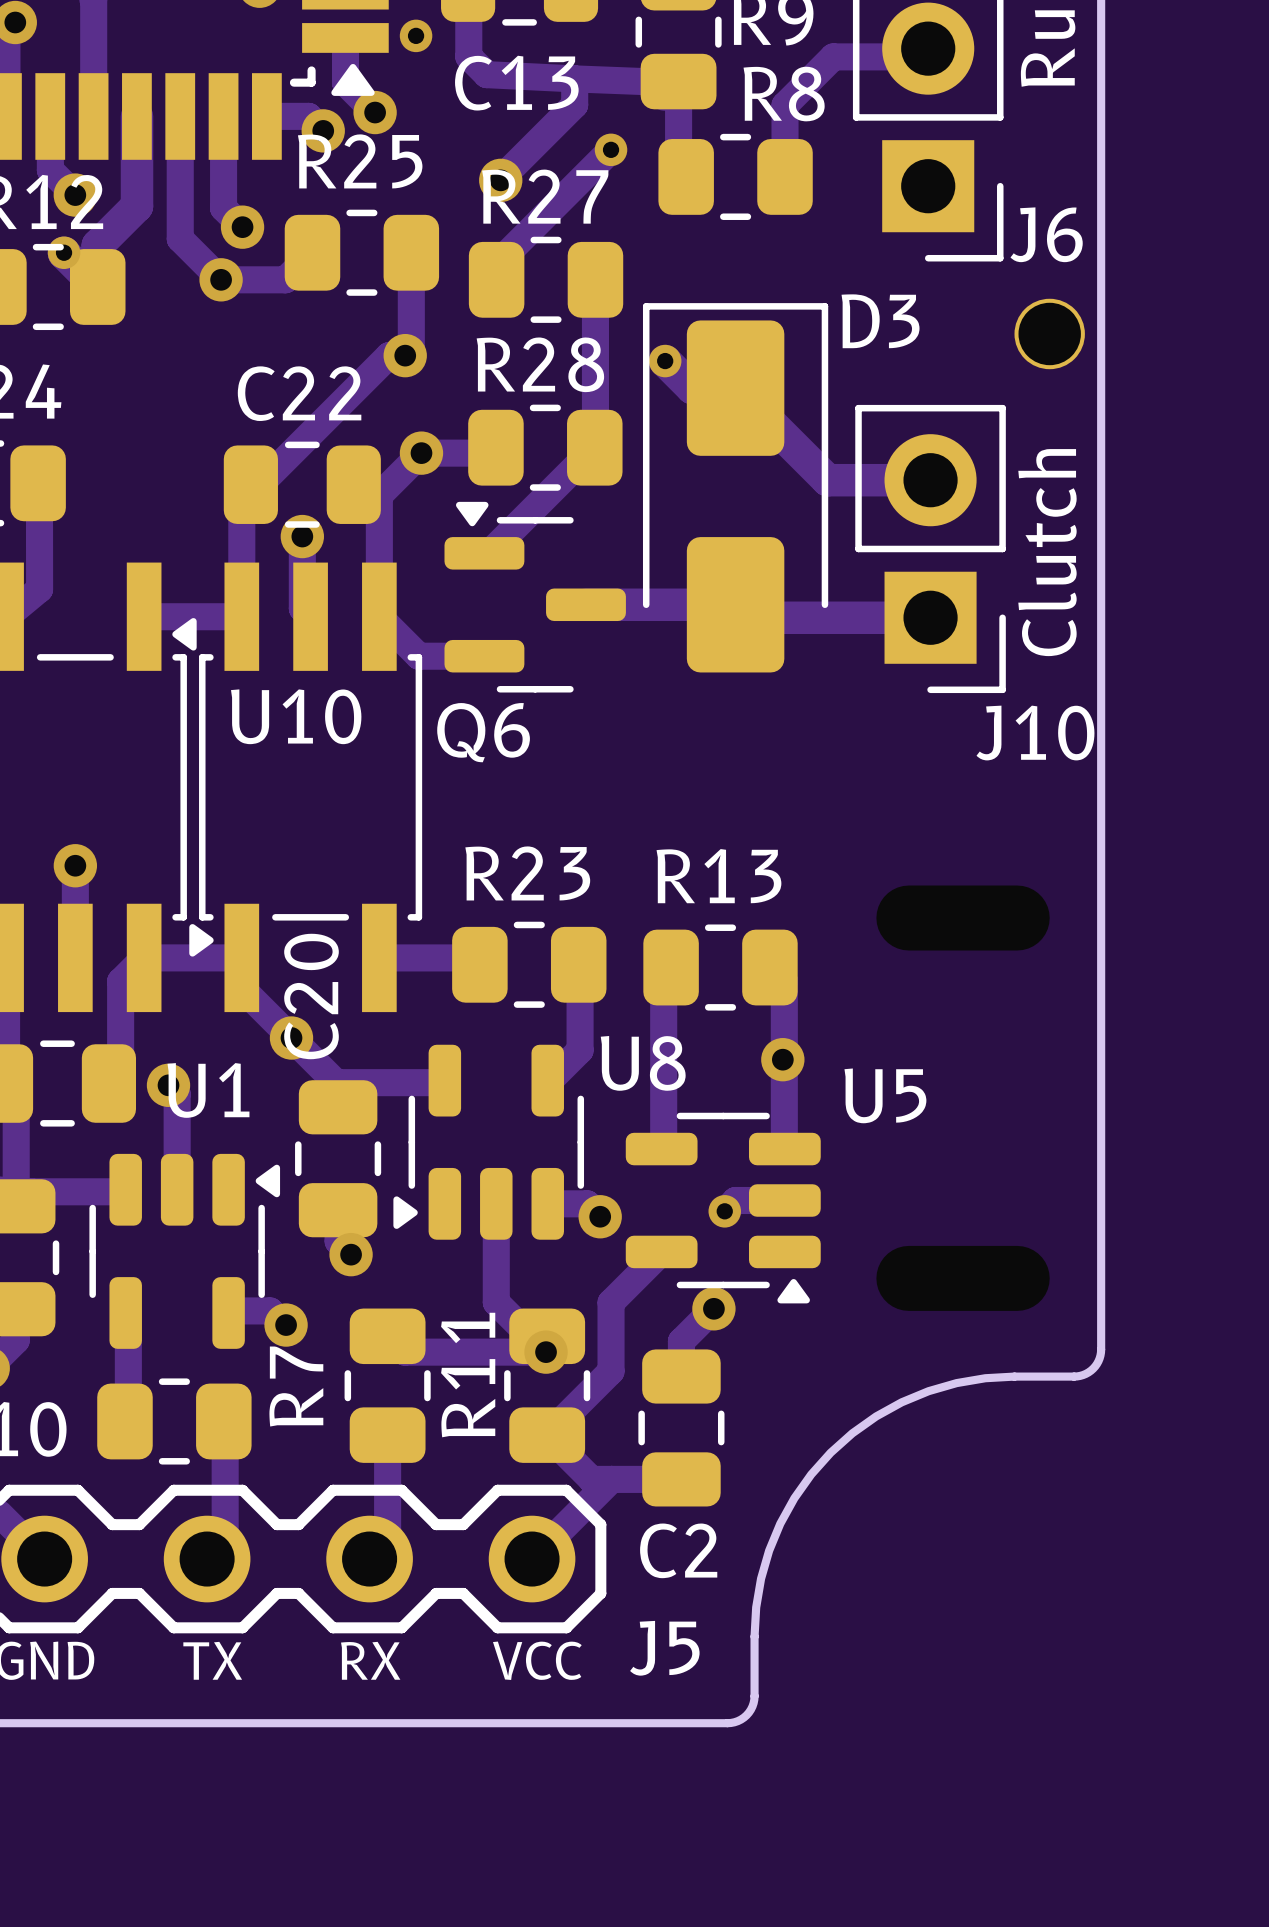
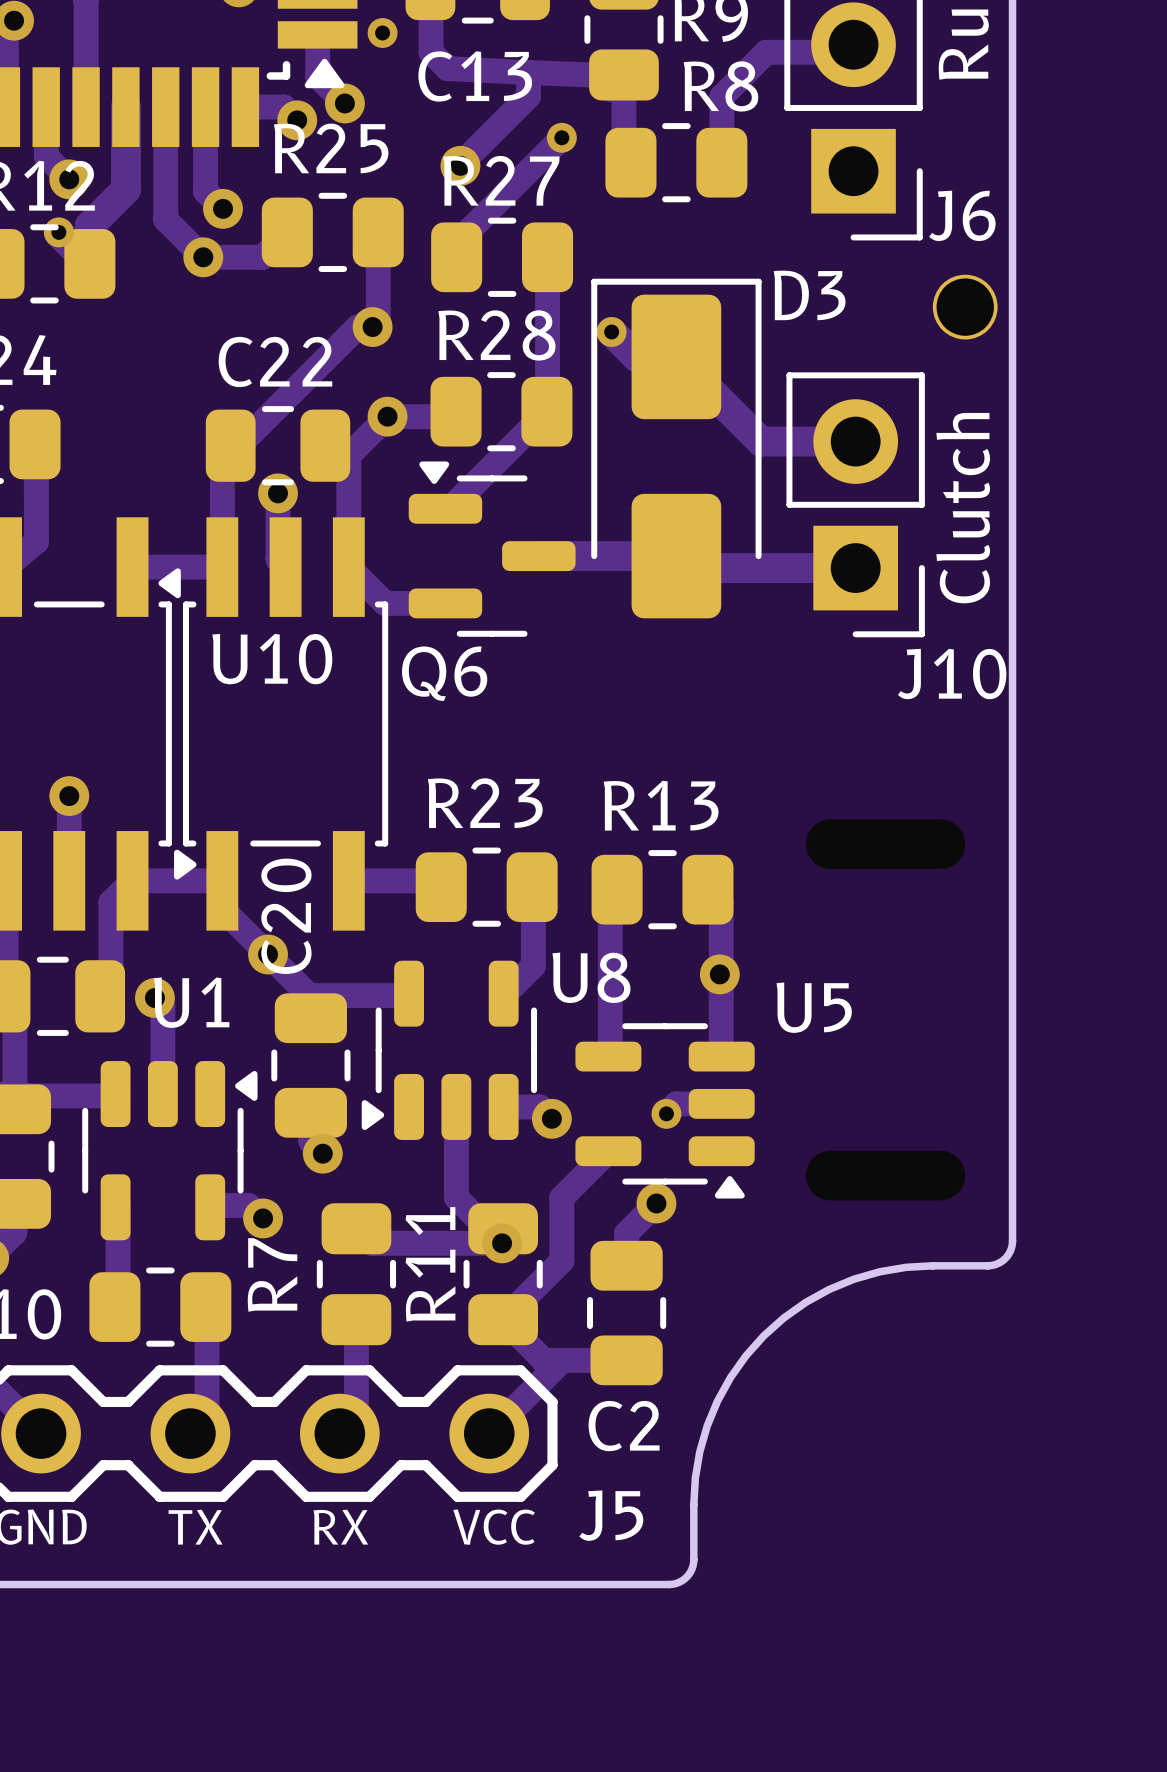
part footprint: [876, 885, 1050, 951] -> [805, 819, 966, 870]
part footprint: [876, 1245, 1050, 1311] -> [805, 1150, 966, 1201]

